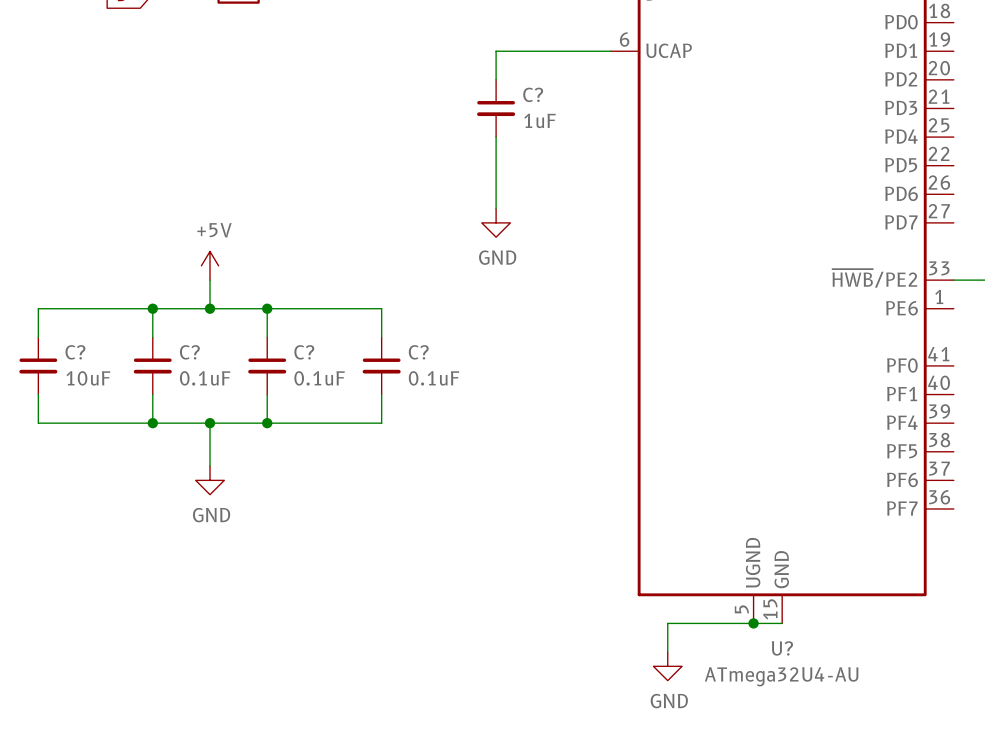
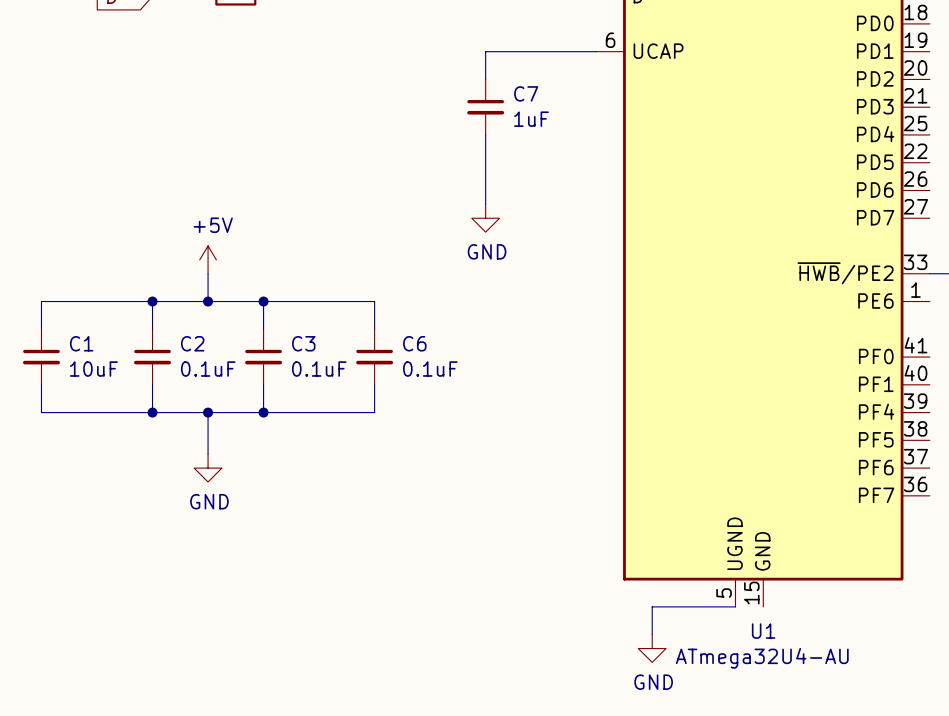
C? name: C? (533, 94) -> C7 (526, 93)
C? name: C? (75, 352) -> C1 (81, 343)
C? name: C? (189, 352) -> C2 (192, 343)
C? name: C? (304, 352) -> C3 (303, 343)
C? name: C? (418, 352) -> C6 (414, 343)
wire: (753, 623) (782, 623) -> none
junction: (753, 623) -> none
U? name: U? (782, 648) -> U1 (763, 631)

